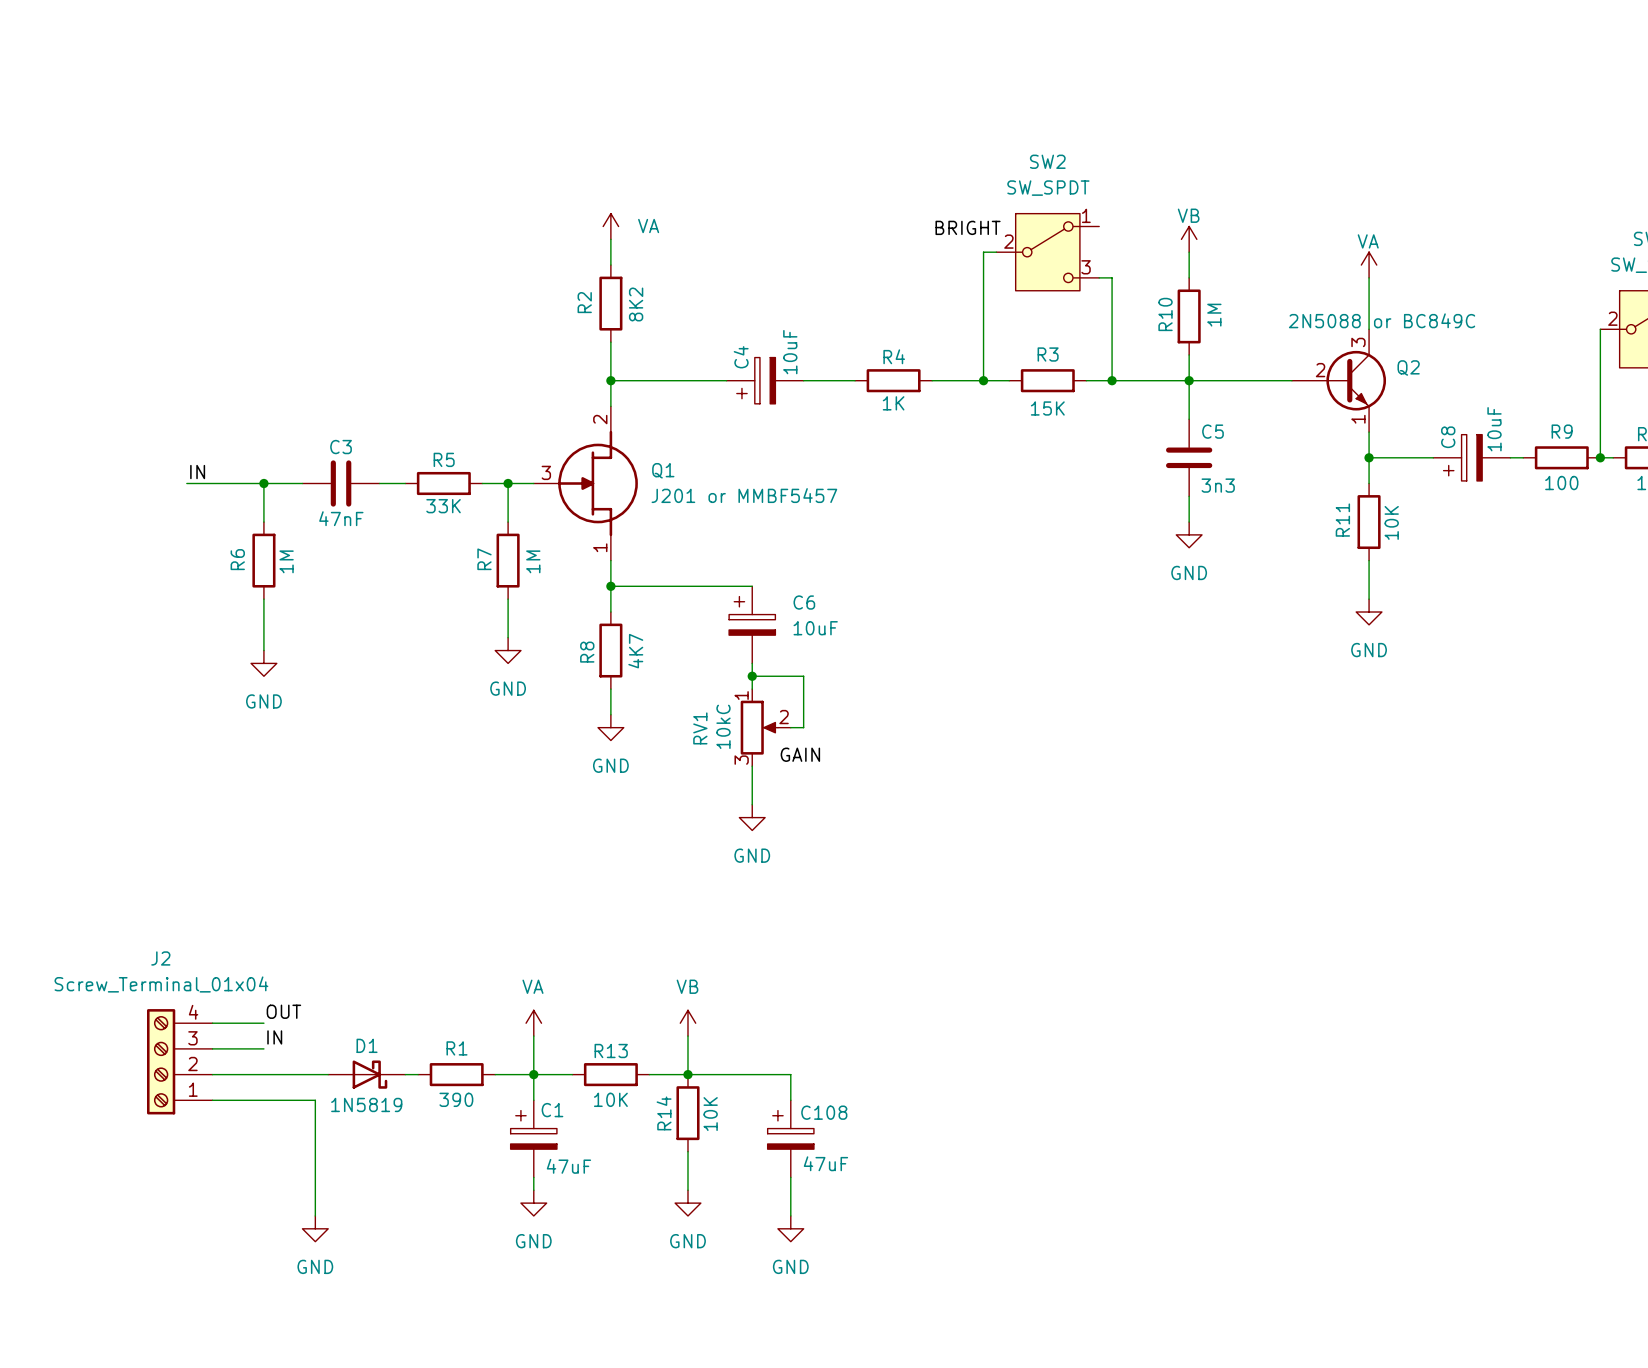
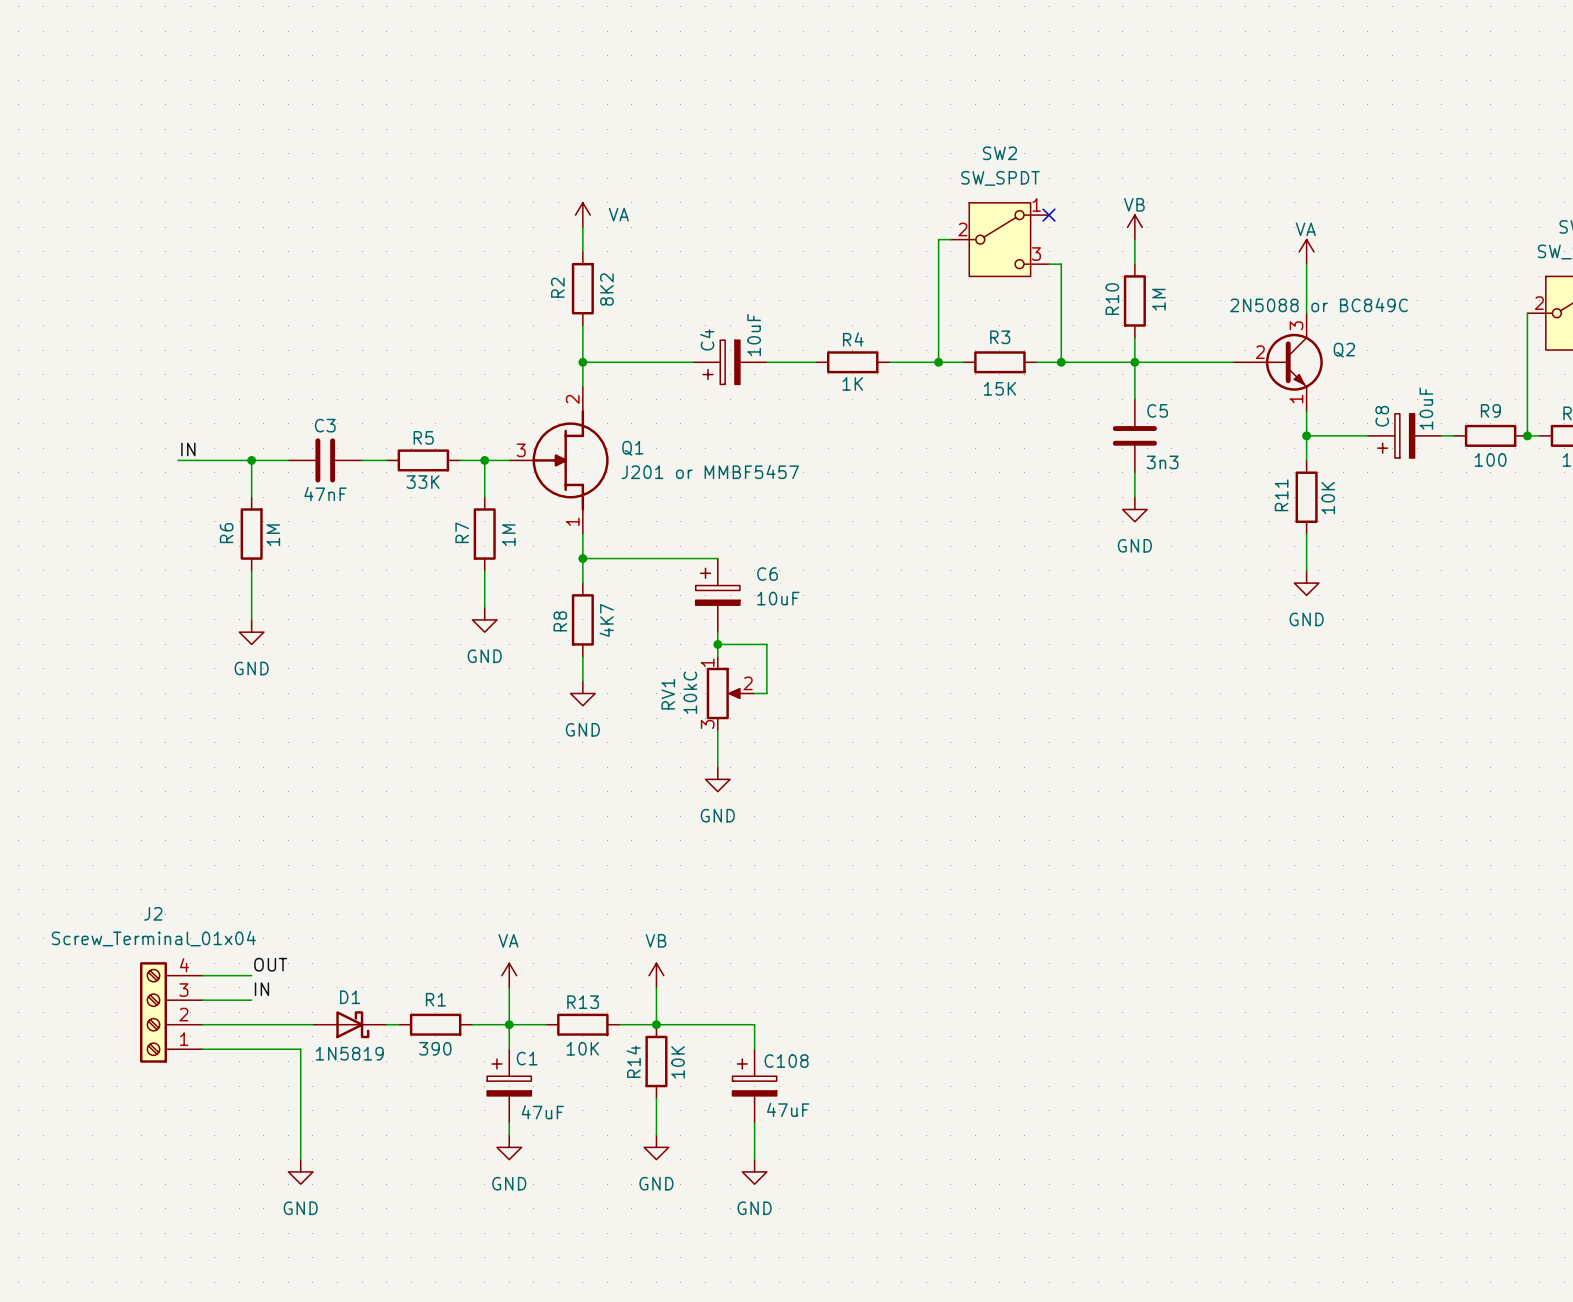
no-connect mark: none -> (1049, 215)
label: BRIGHT (968, 227) -> none
label: GAIN (800, 754) -> none

